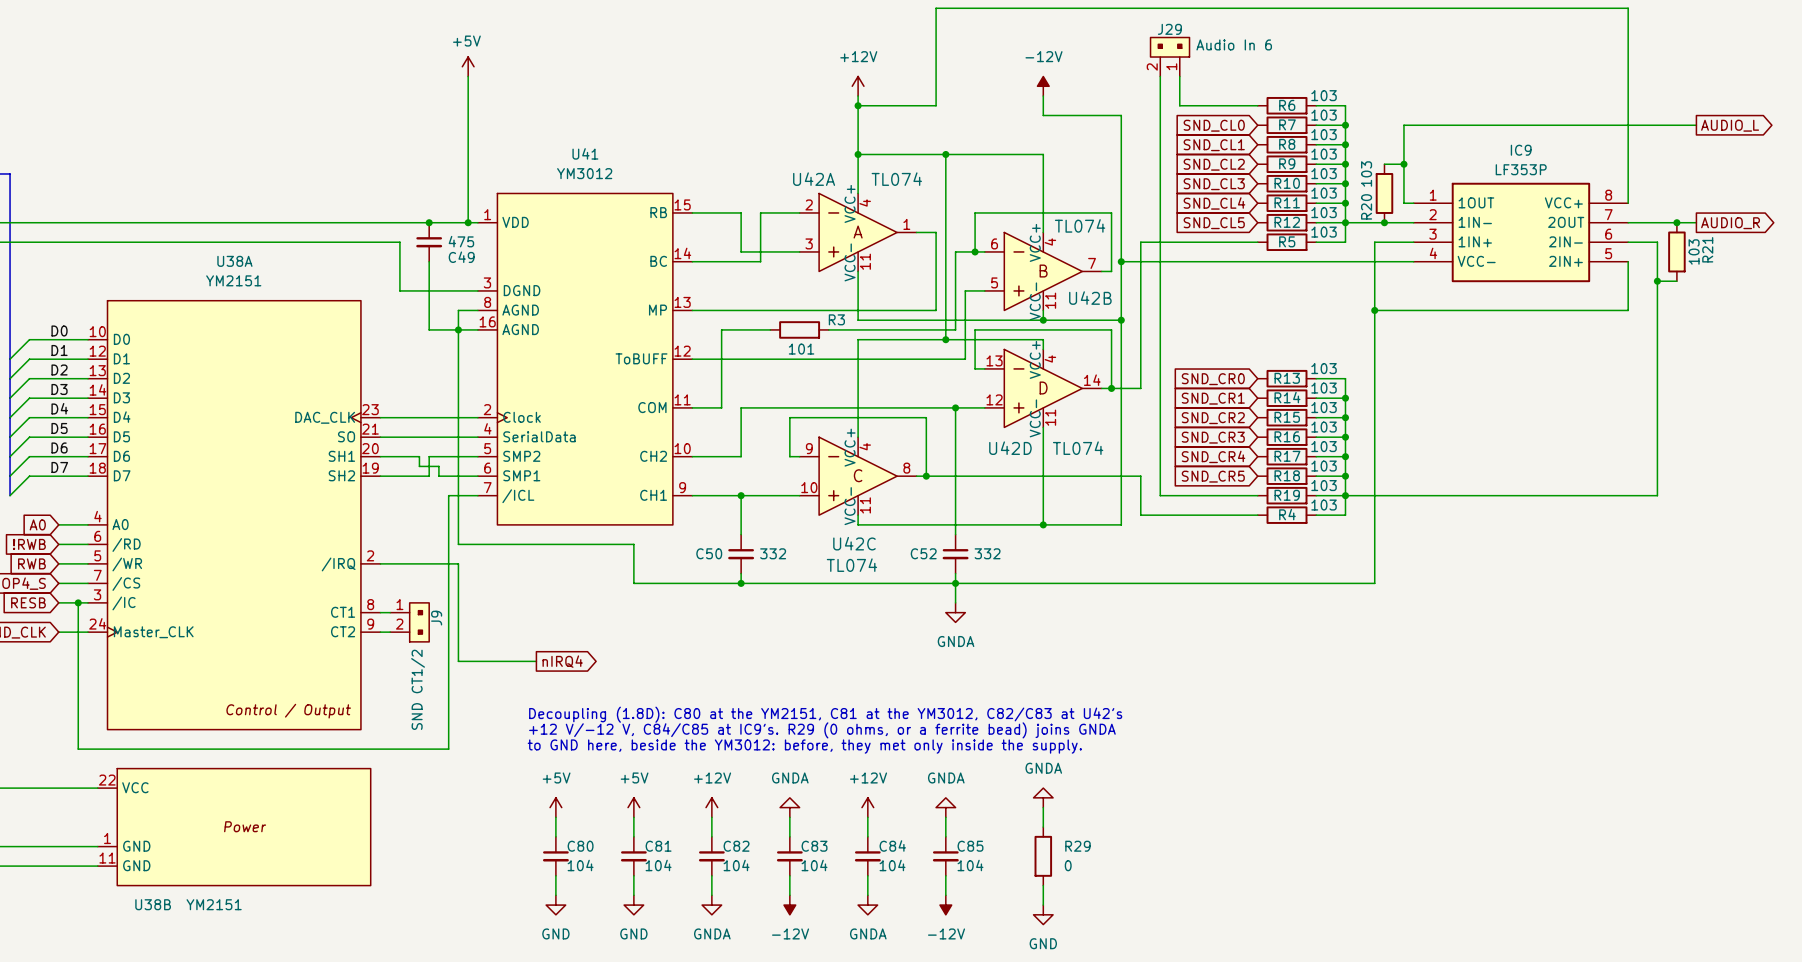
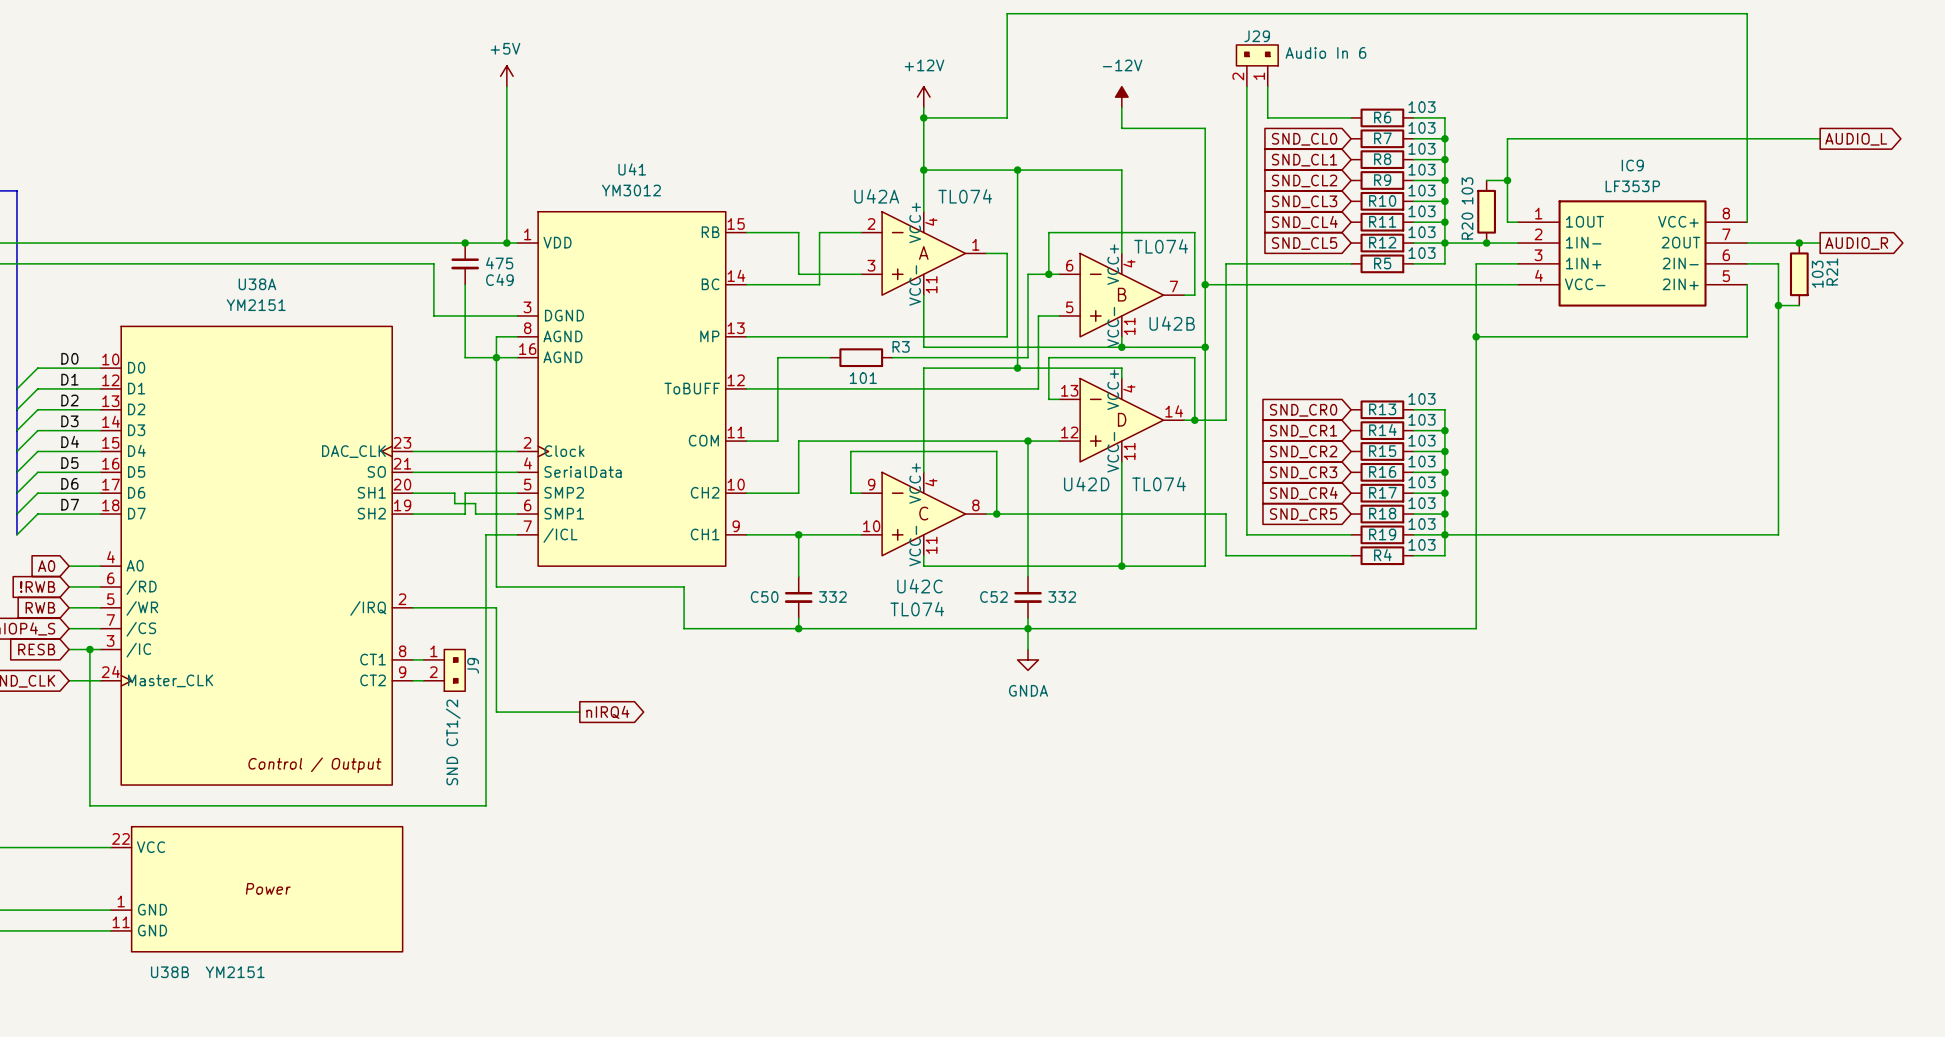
text: Decoupling (1.8D): C80 at the YM2151, C81 at the YM3012, C82/C83 at U42's (825, 714) -> none
text: +12 V/-12 V, C84/C85 at IC9's. R29 (0 ohms, or a ferrite bead) joins GNDA (822, 730) -> none
text: to GND here, beside the YM3012: before, they met only inside the supply. (804, 746) -> none
power symbol: GNDA (1043, 797) -> none
power symbol: +5V (555, 807) -> none
power symbol: +5V (633, 807) -> none
power symbol: +12V (711, 807) -> none
power symbol: GNDA (789, 807) -> none
power symbol: +12V (867, 807) -> none
power symbol: GNDA (945, 807) -> none
wire: (1043, 807) (1043, 827) -> none
wire: (555, 817) (555, 836) -> none
wire: (633, 817) (633, 836) -> none
wire: (711, 817) (711, 836) -> none
wire: (789, 817) (789, 836) -> none
wire: (867, 817) (867, 836) -> none
wire: (945, 817) (945, 836) -> none
C80: 104 (555, 856) -> none
C81: 104 (633, 856) -> none
C82: 104 (711, 856) -> none
C83: 104 (789, 856) -> none
C84: 104 (867, 856) -> none
C85: 104 (945, 856) -> none
R29: 0 (1043, 856) -> none
wire: (555, 875) (555, 895) -> none
wire: (633, 875) (633, 895) -> none
wire: (711, 875) (711, 895) -> none
wire: (789, 875) (789, 895) -> none
wire: (867, 875) (867, 895) -> none
wire: (945, 875) (945, 895) -> none
wire: (1043, 885) (1043, 905) -> none
power symbol: GND (555, 905) -> none
power symbol: GND (633, 905) -> none
power symbol: GNDA (711, 905) -> none
power symbol: -12V (789, 905) -> none
power symbol: GNDA (867, 905) -> none
power symbol: -12V (945, 905) -> none
power symbol: GND (1043, 914) -> none

